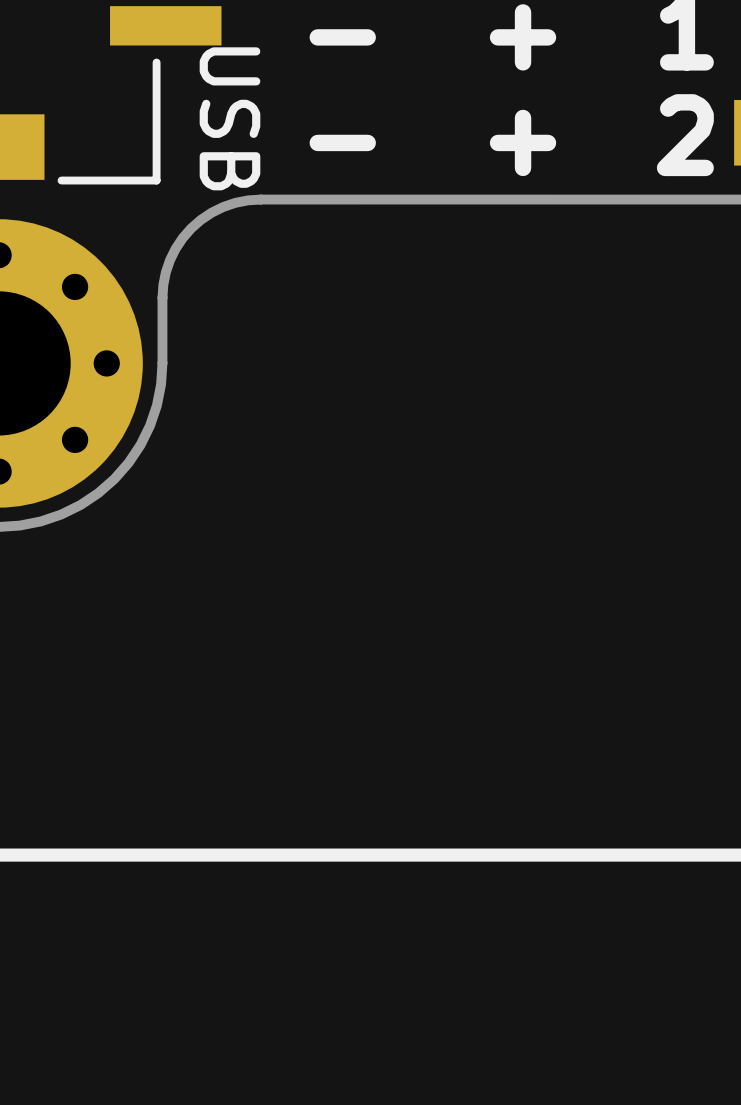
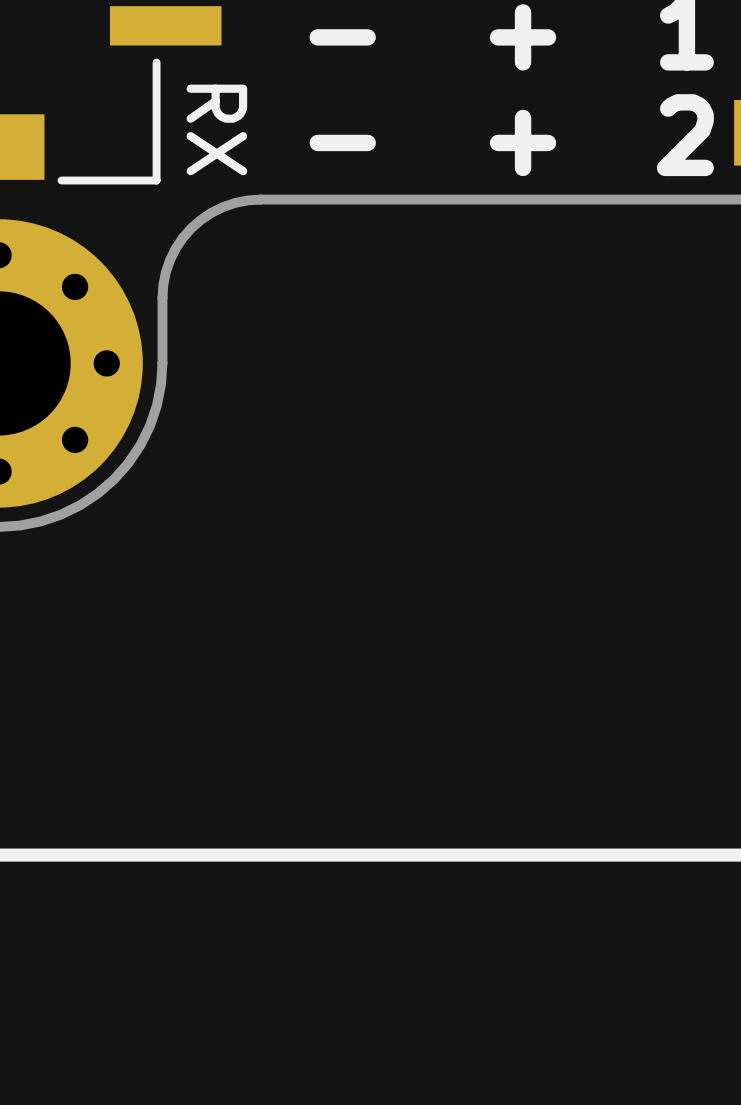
text: USB (229, 118) -> RX (216, 129)

